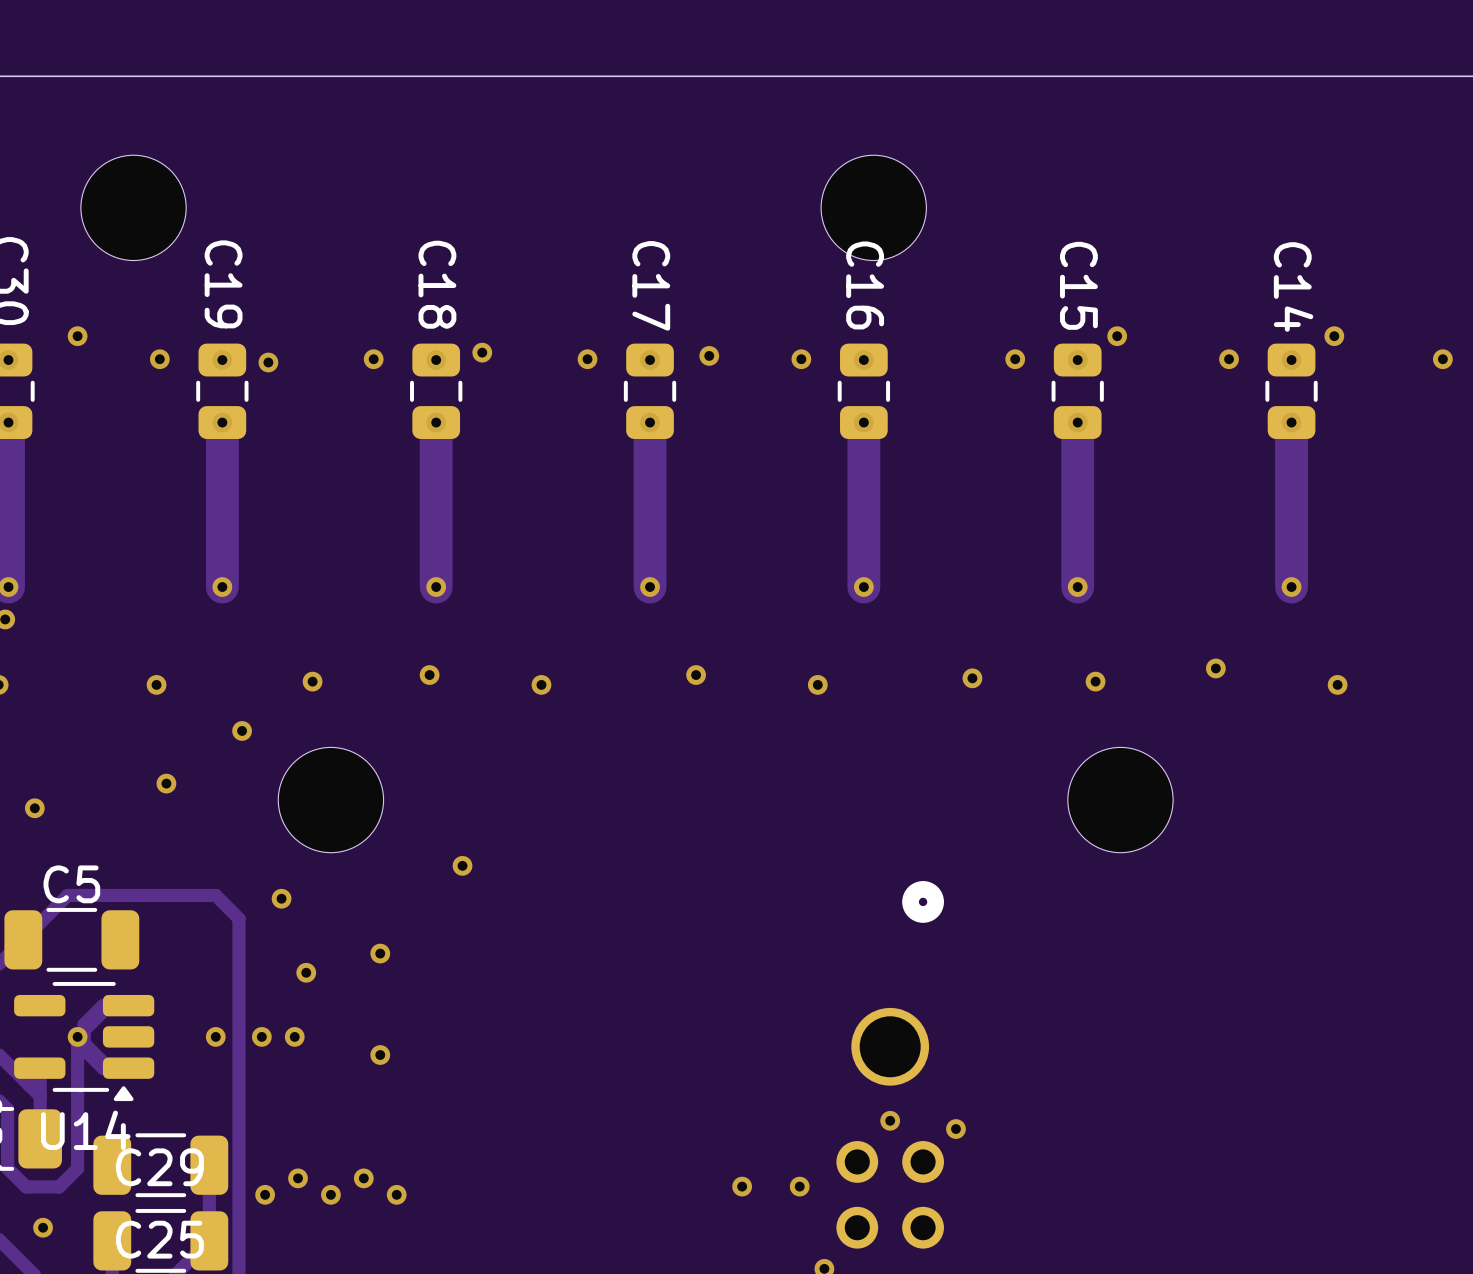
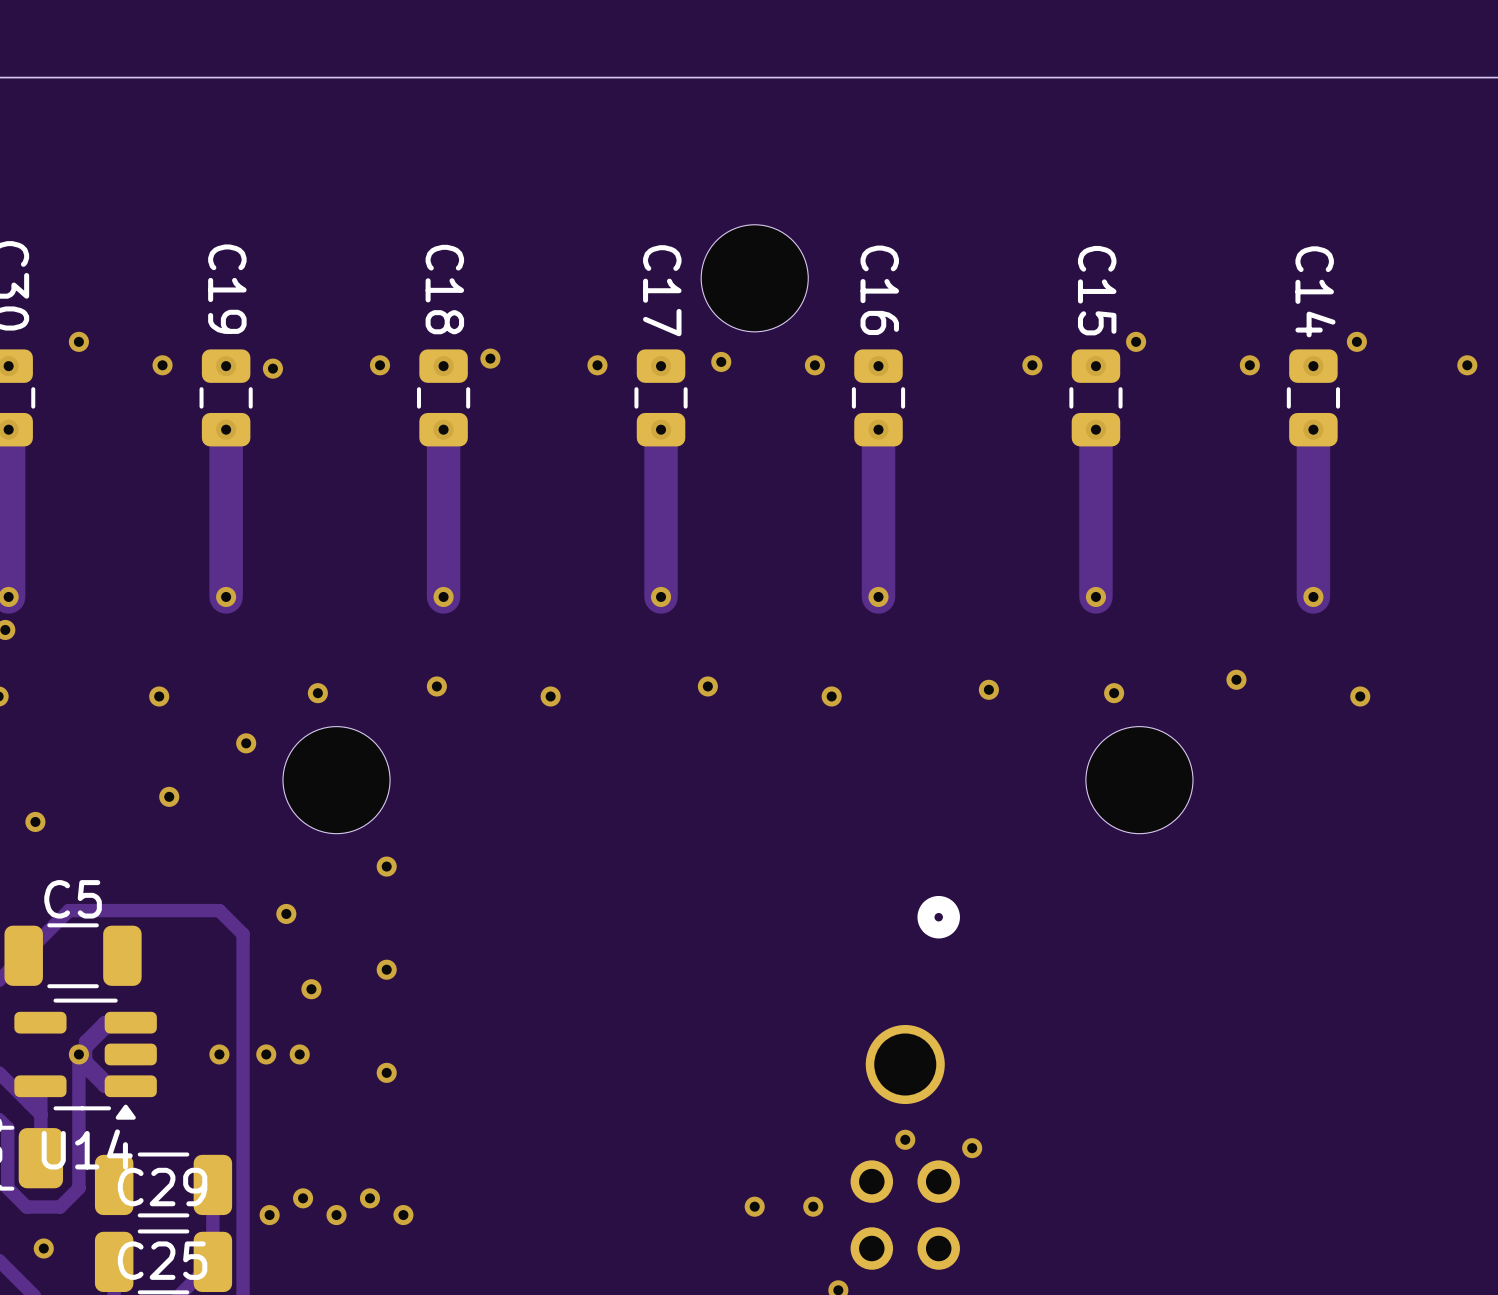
part: (133, 207) -> none
part position: (873, 207) -> (754, 278)
part position: (330, 800) -> (336, 780)
part position: (1120, 800) -> (1139, 780)
via position: (462, 865) -> (386, 866)

